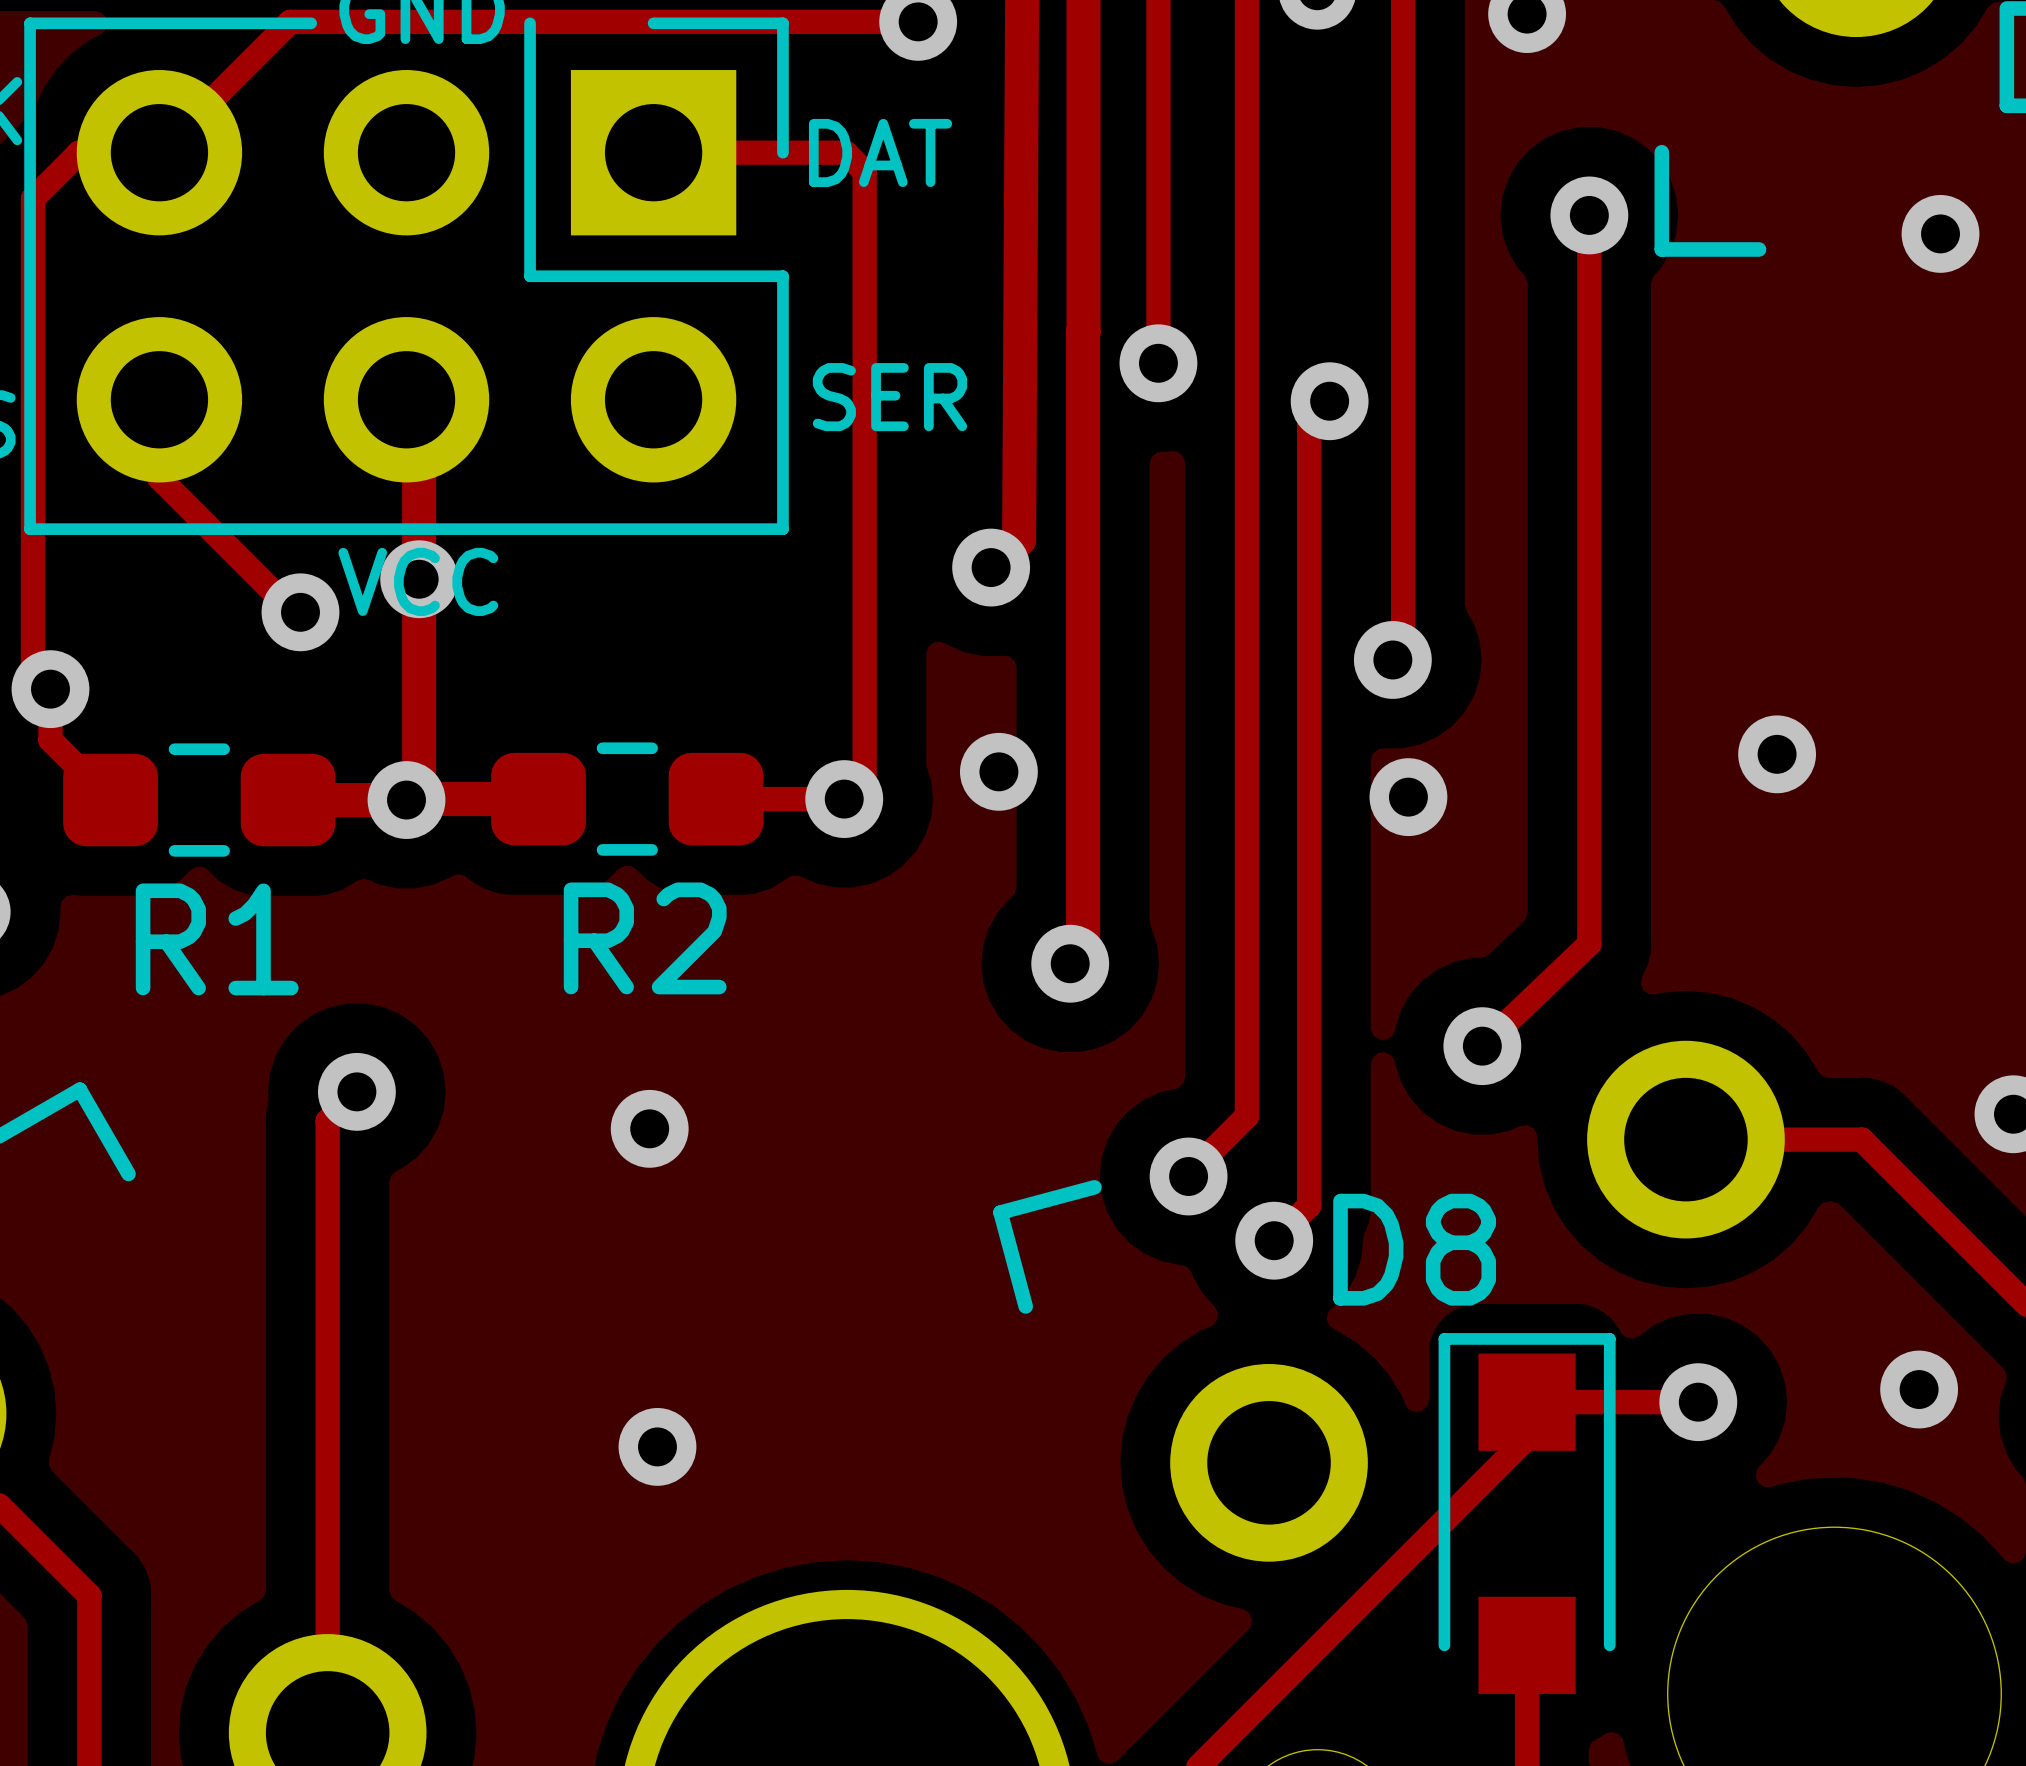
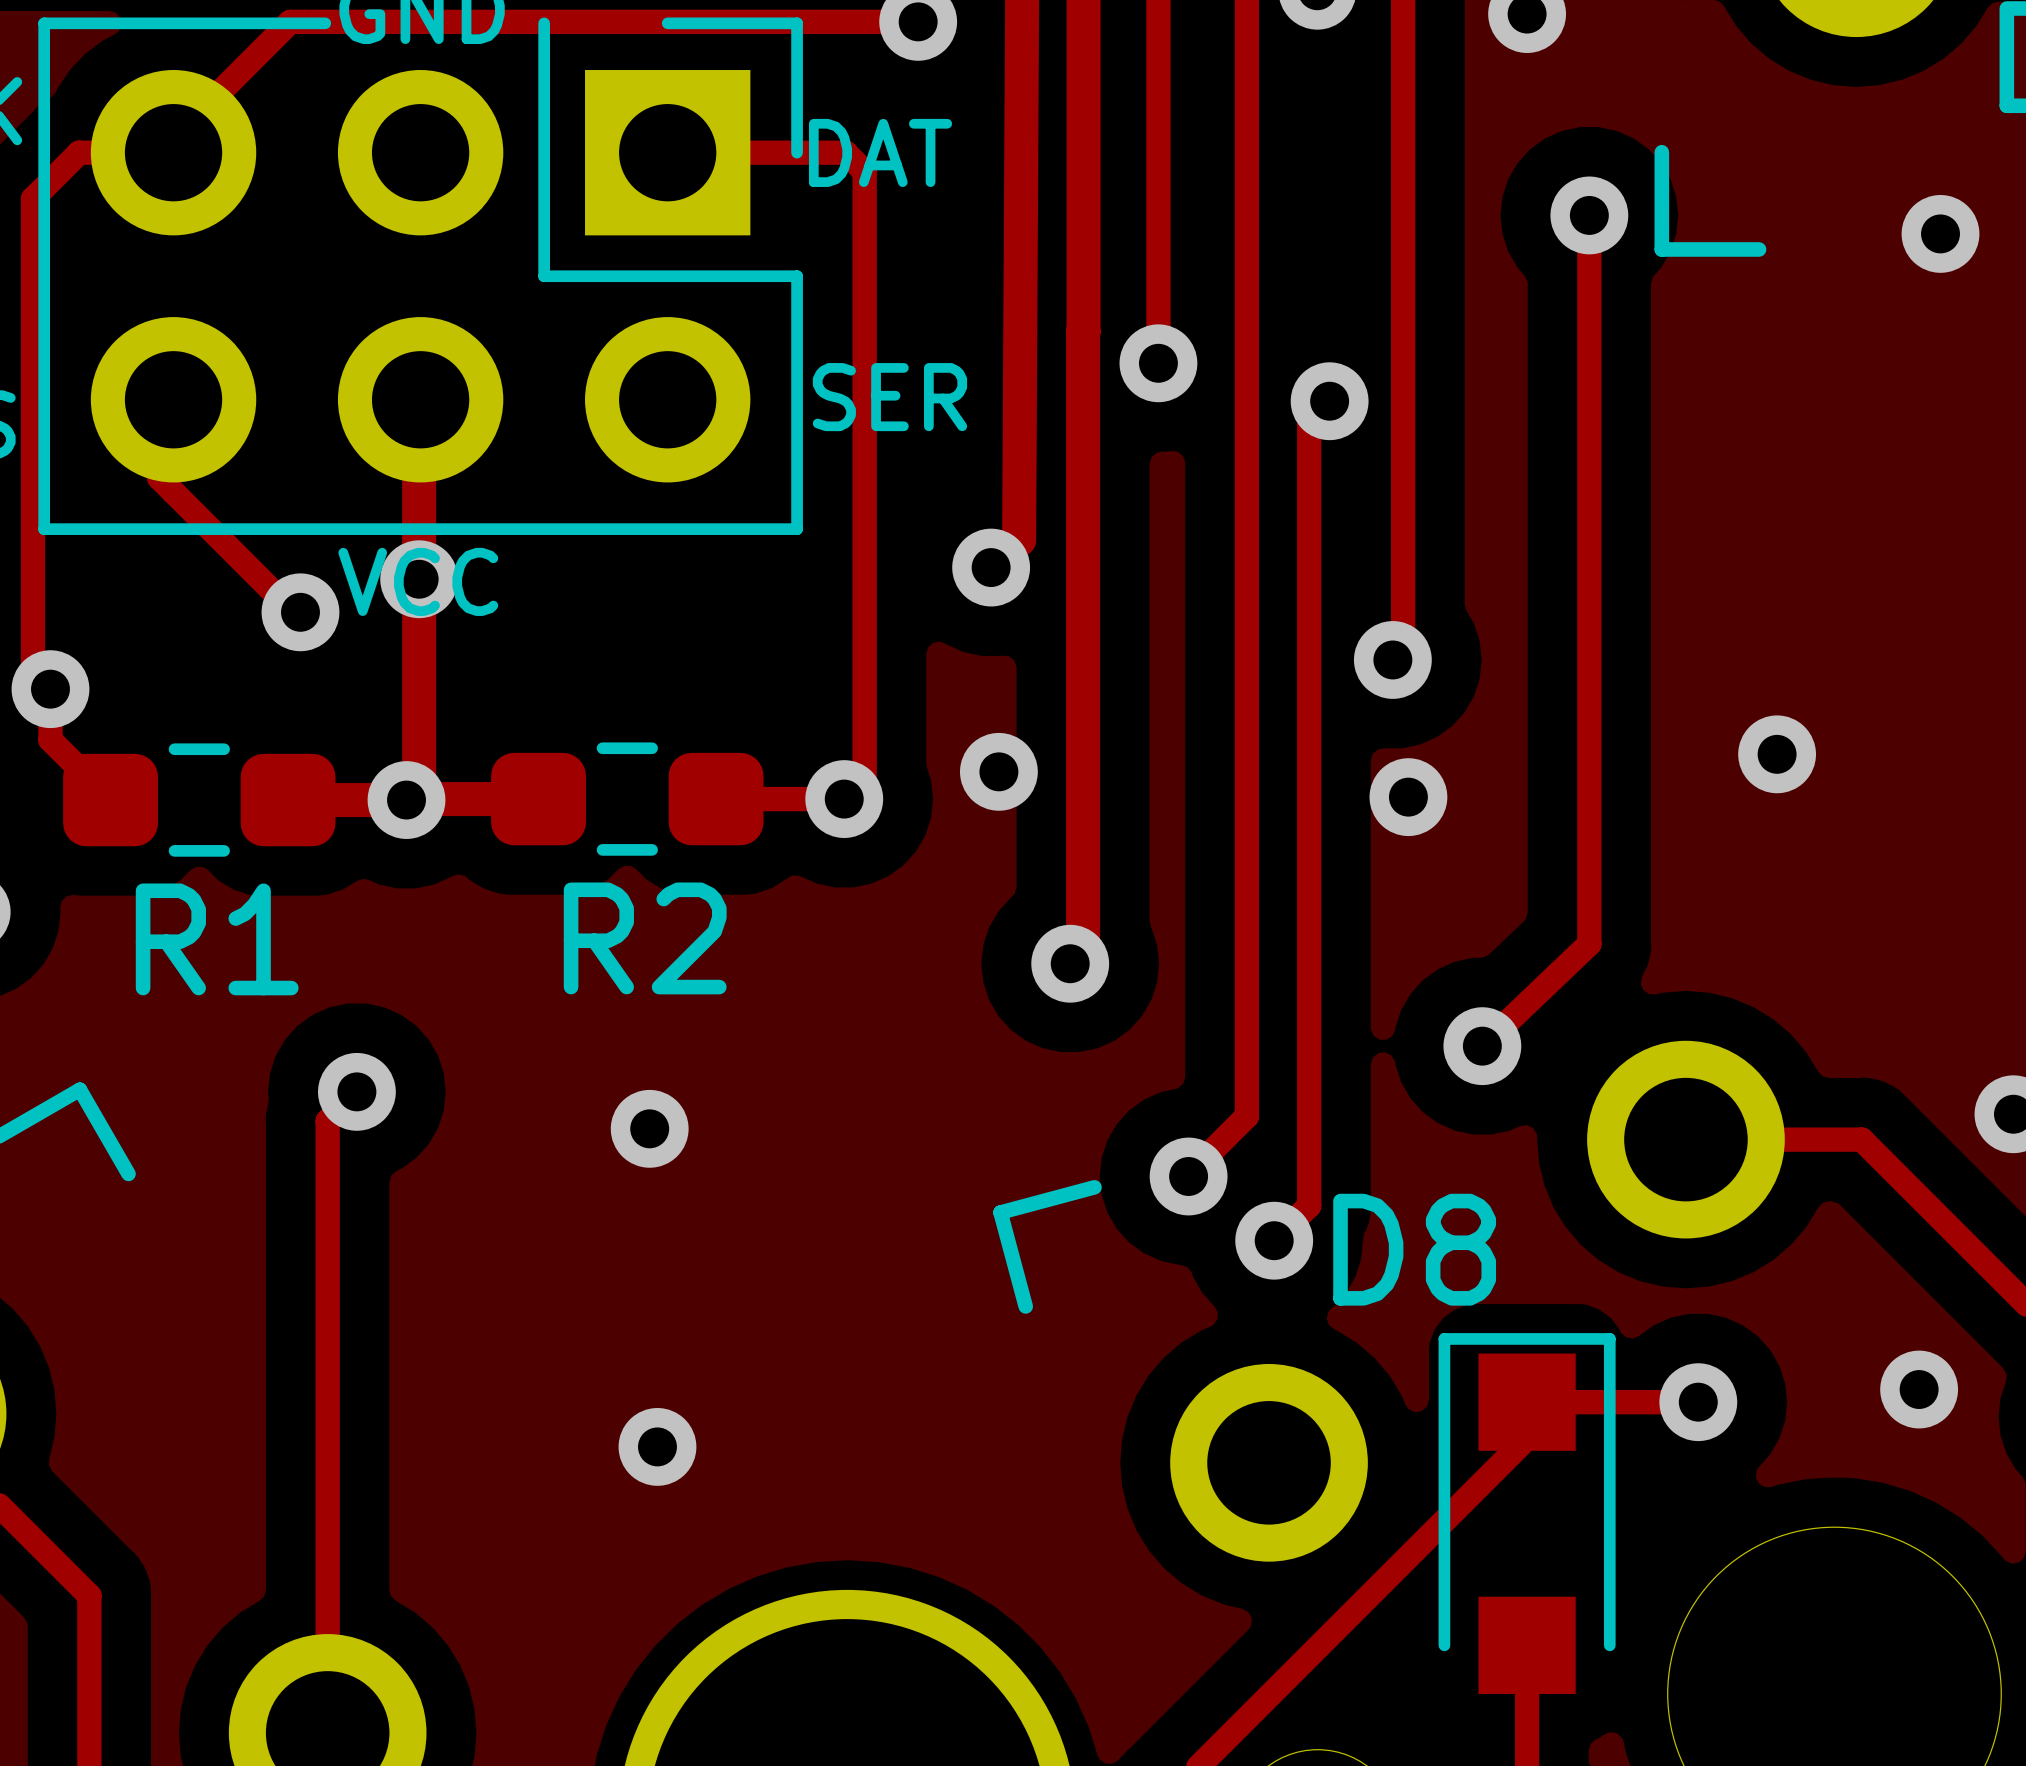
part position: (406, 276) -> (420, 276)

